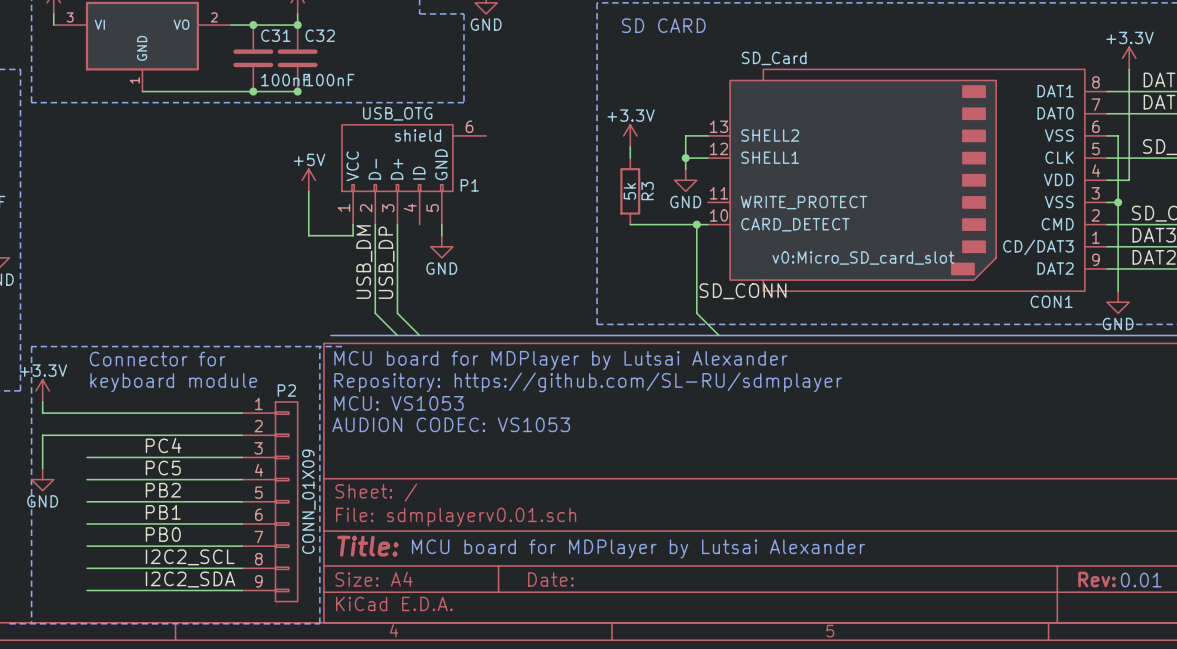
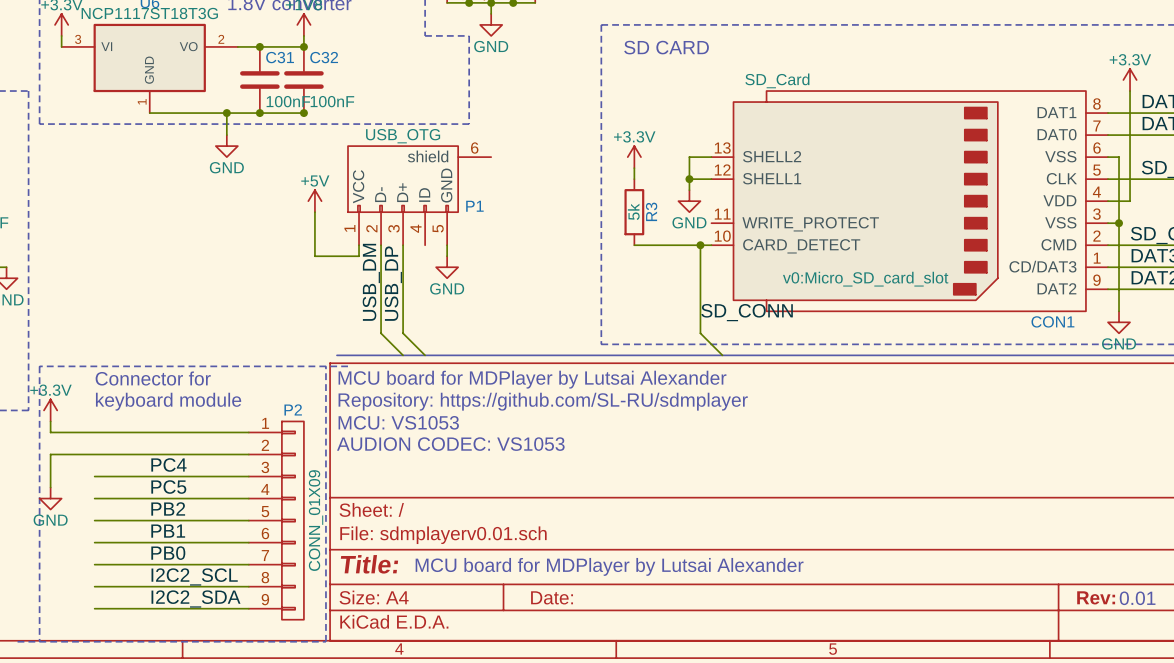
wire: none -> (226, 113) (226, 135)
junction: none -> (226, 113)
power symbol: none -> GND (226, 146)

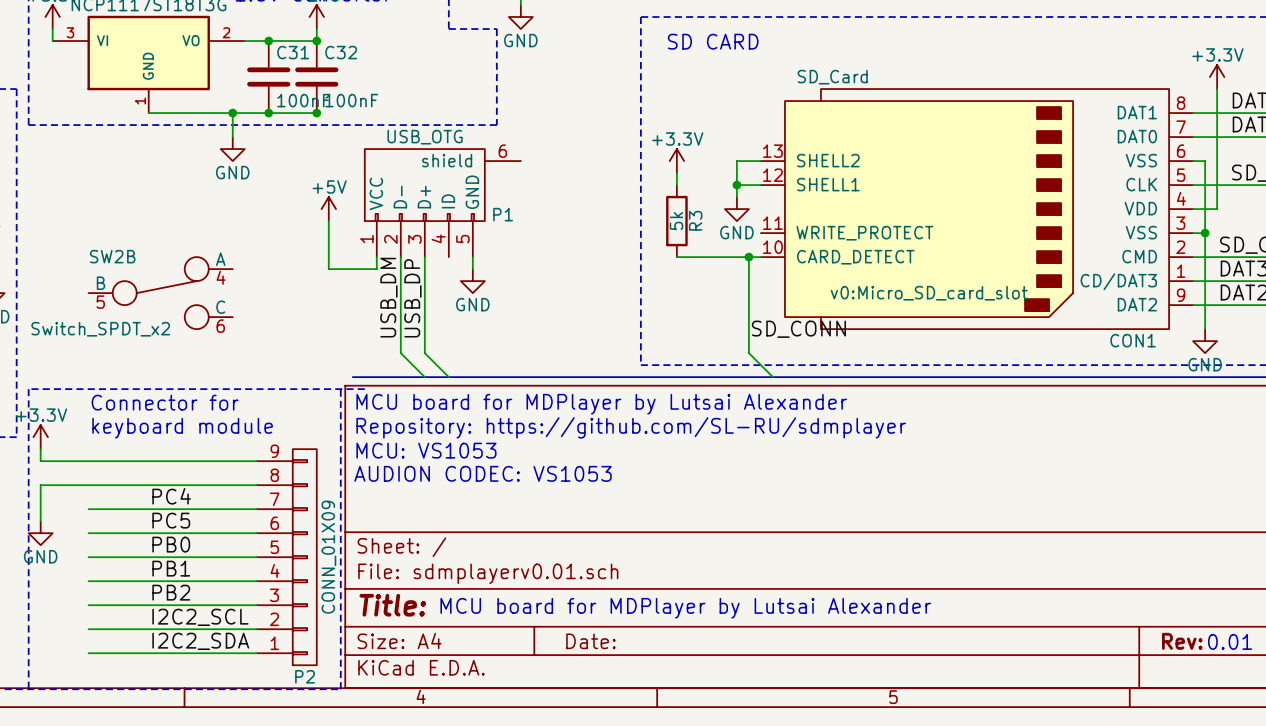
SW2B: none -> Switch_SPDT_x2 (160, 293)
label: PB2 (168, 508) -> PB0 (171, 544)
P2 flip: as is (292, 520) -> up-down (304, 557)
label: PB0 (168, 553) -> PB2 (171, 592)

